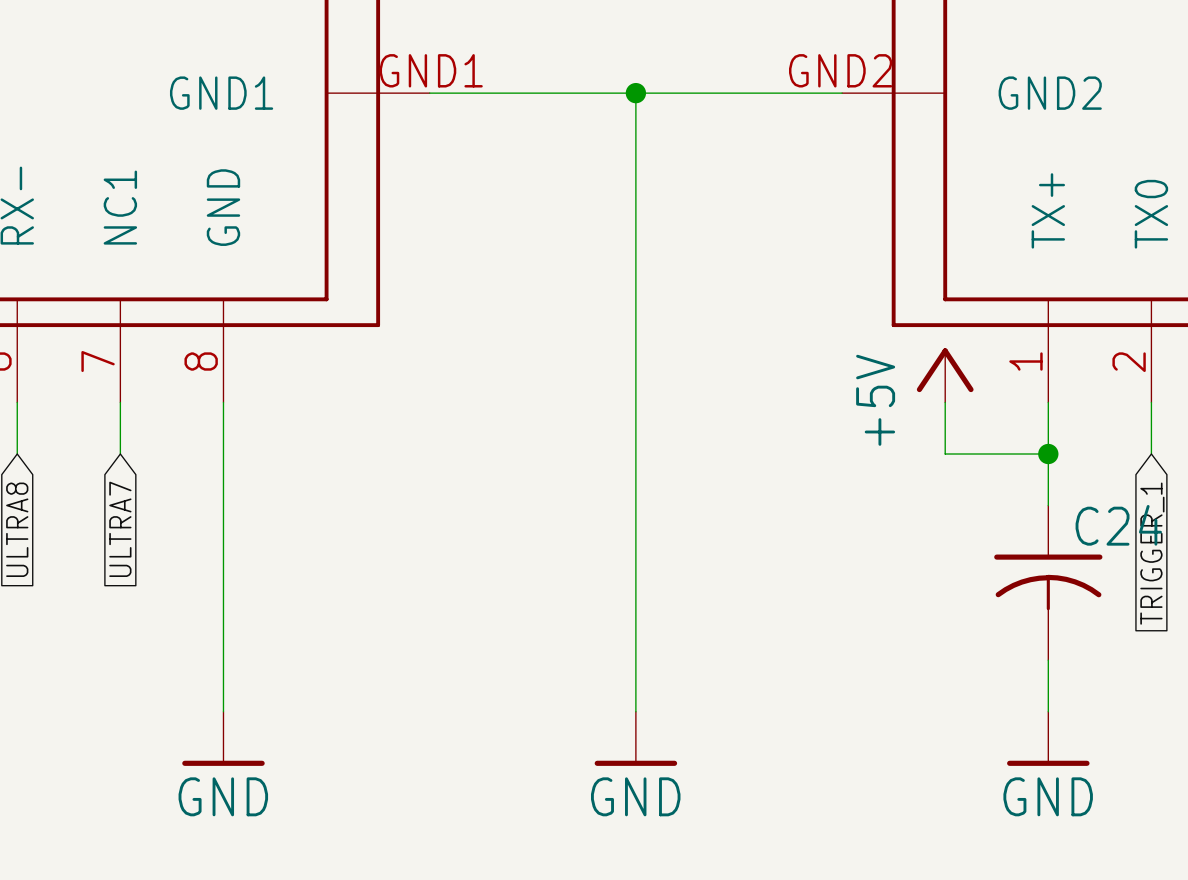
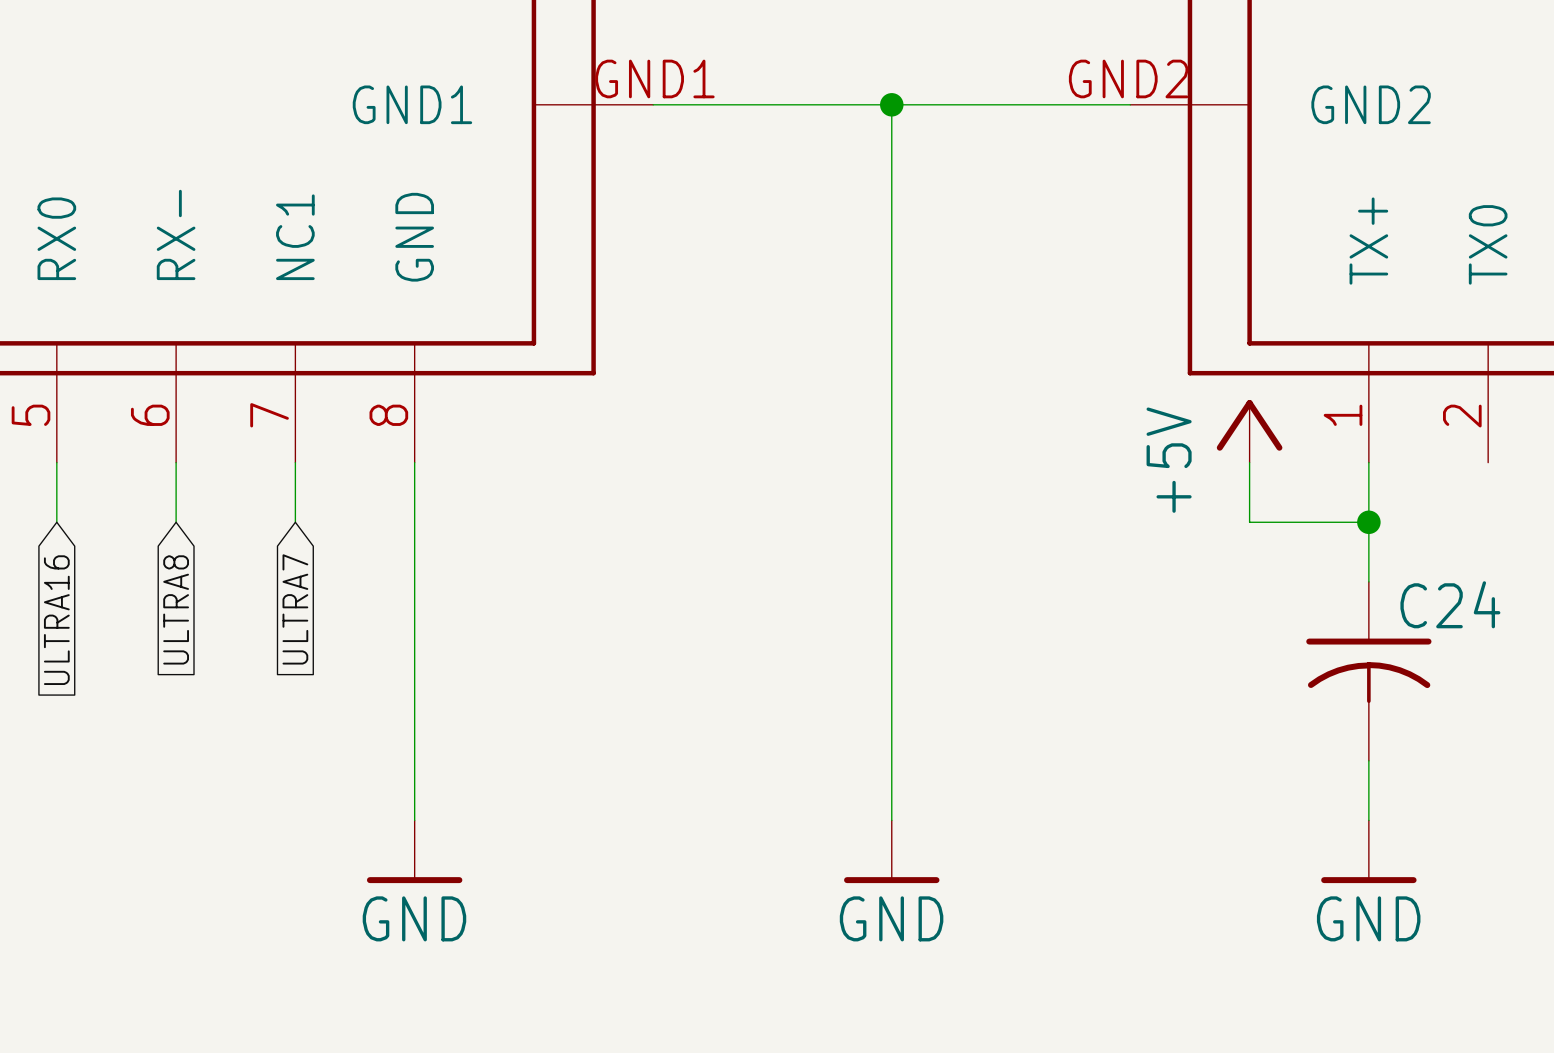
wire: (1151, 402) (1151, 454) -> none
global label: TRIGGER_1 (1152, 553) -> none

